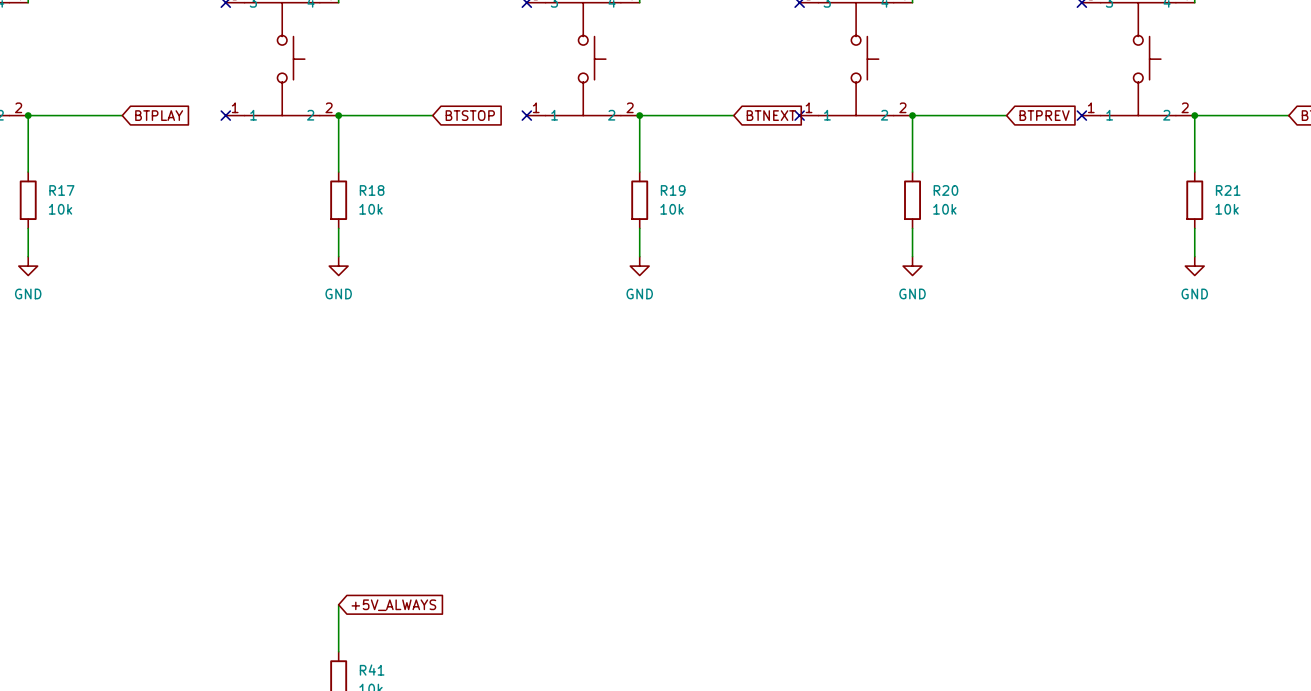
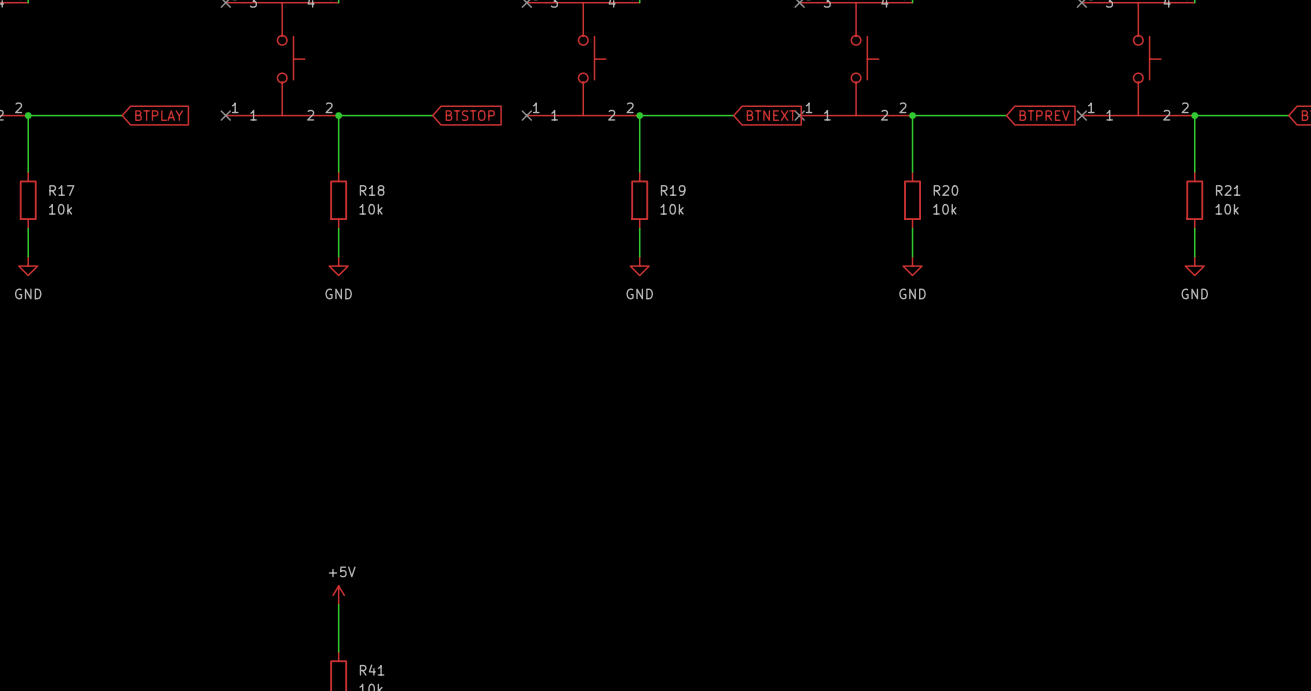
power symbol: none -> +5V (338, 595)
global label: +5V_ALWAYS (393, 605) -> none

